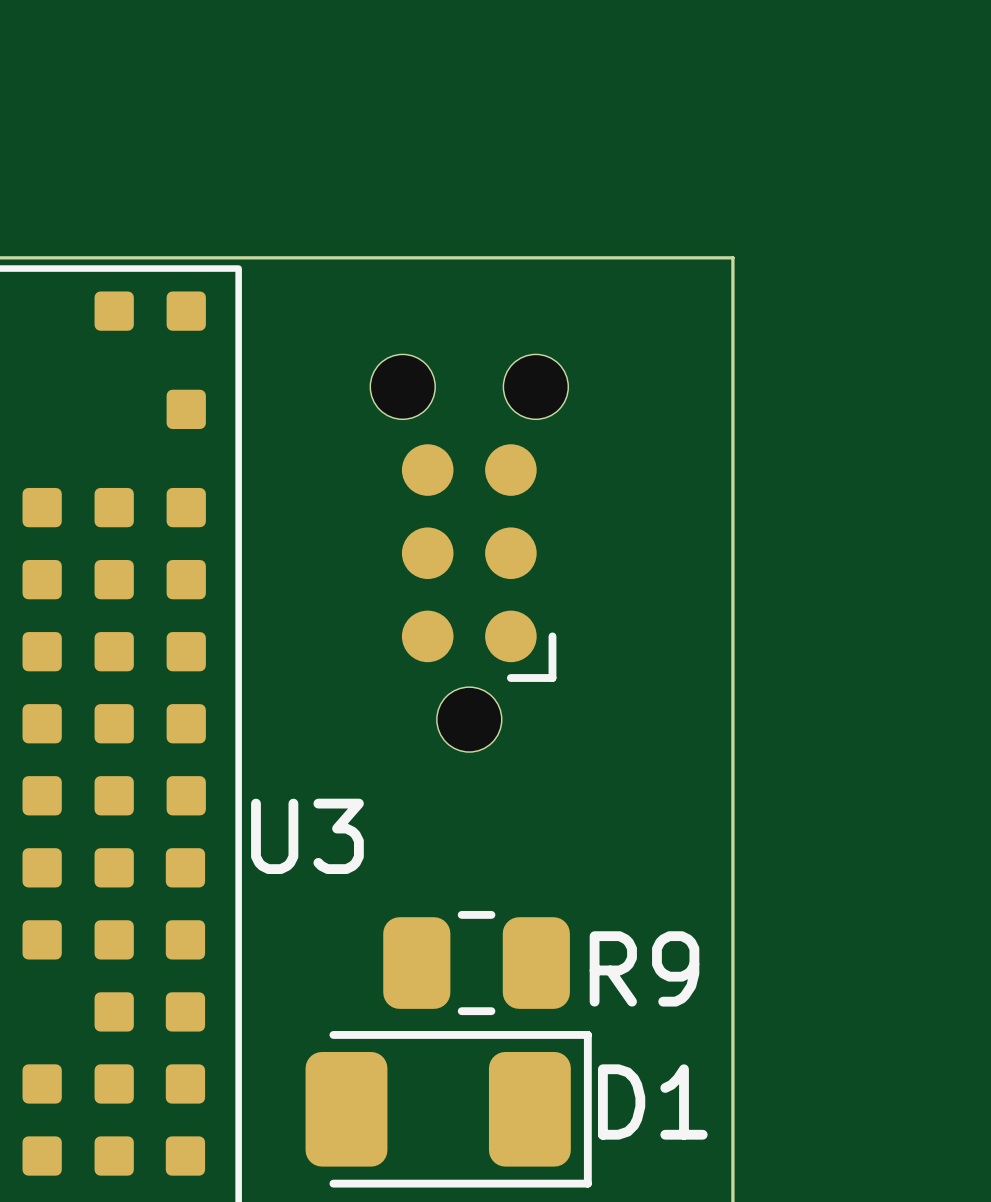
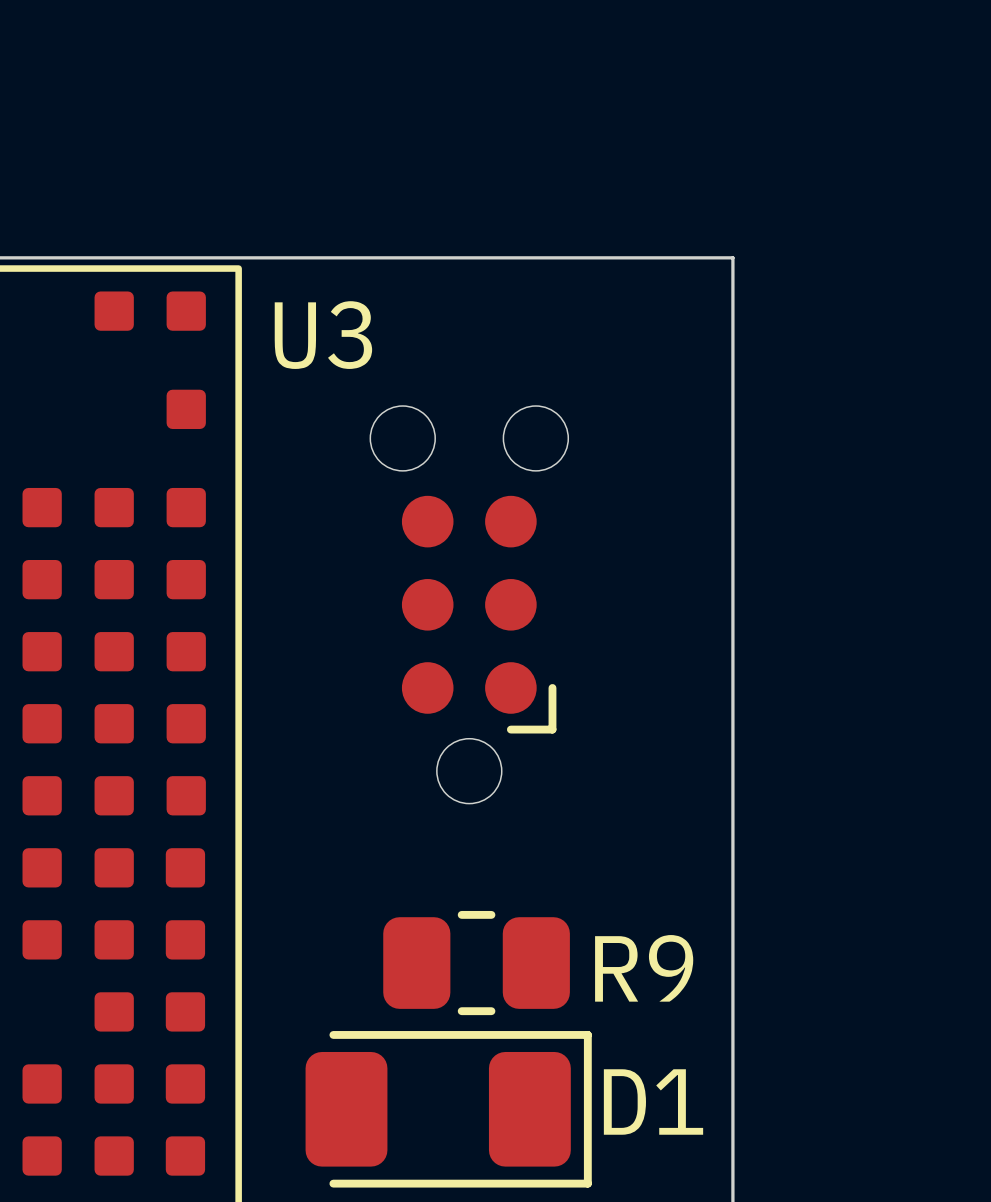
part position: (469, 553) -> (469, 604)
U3 name position: U3 (307, 836) -> U3 (323, 335)

